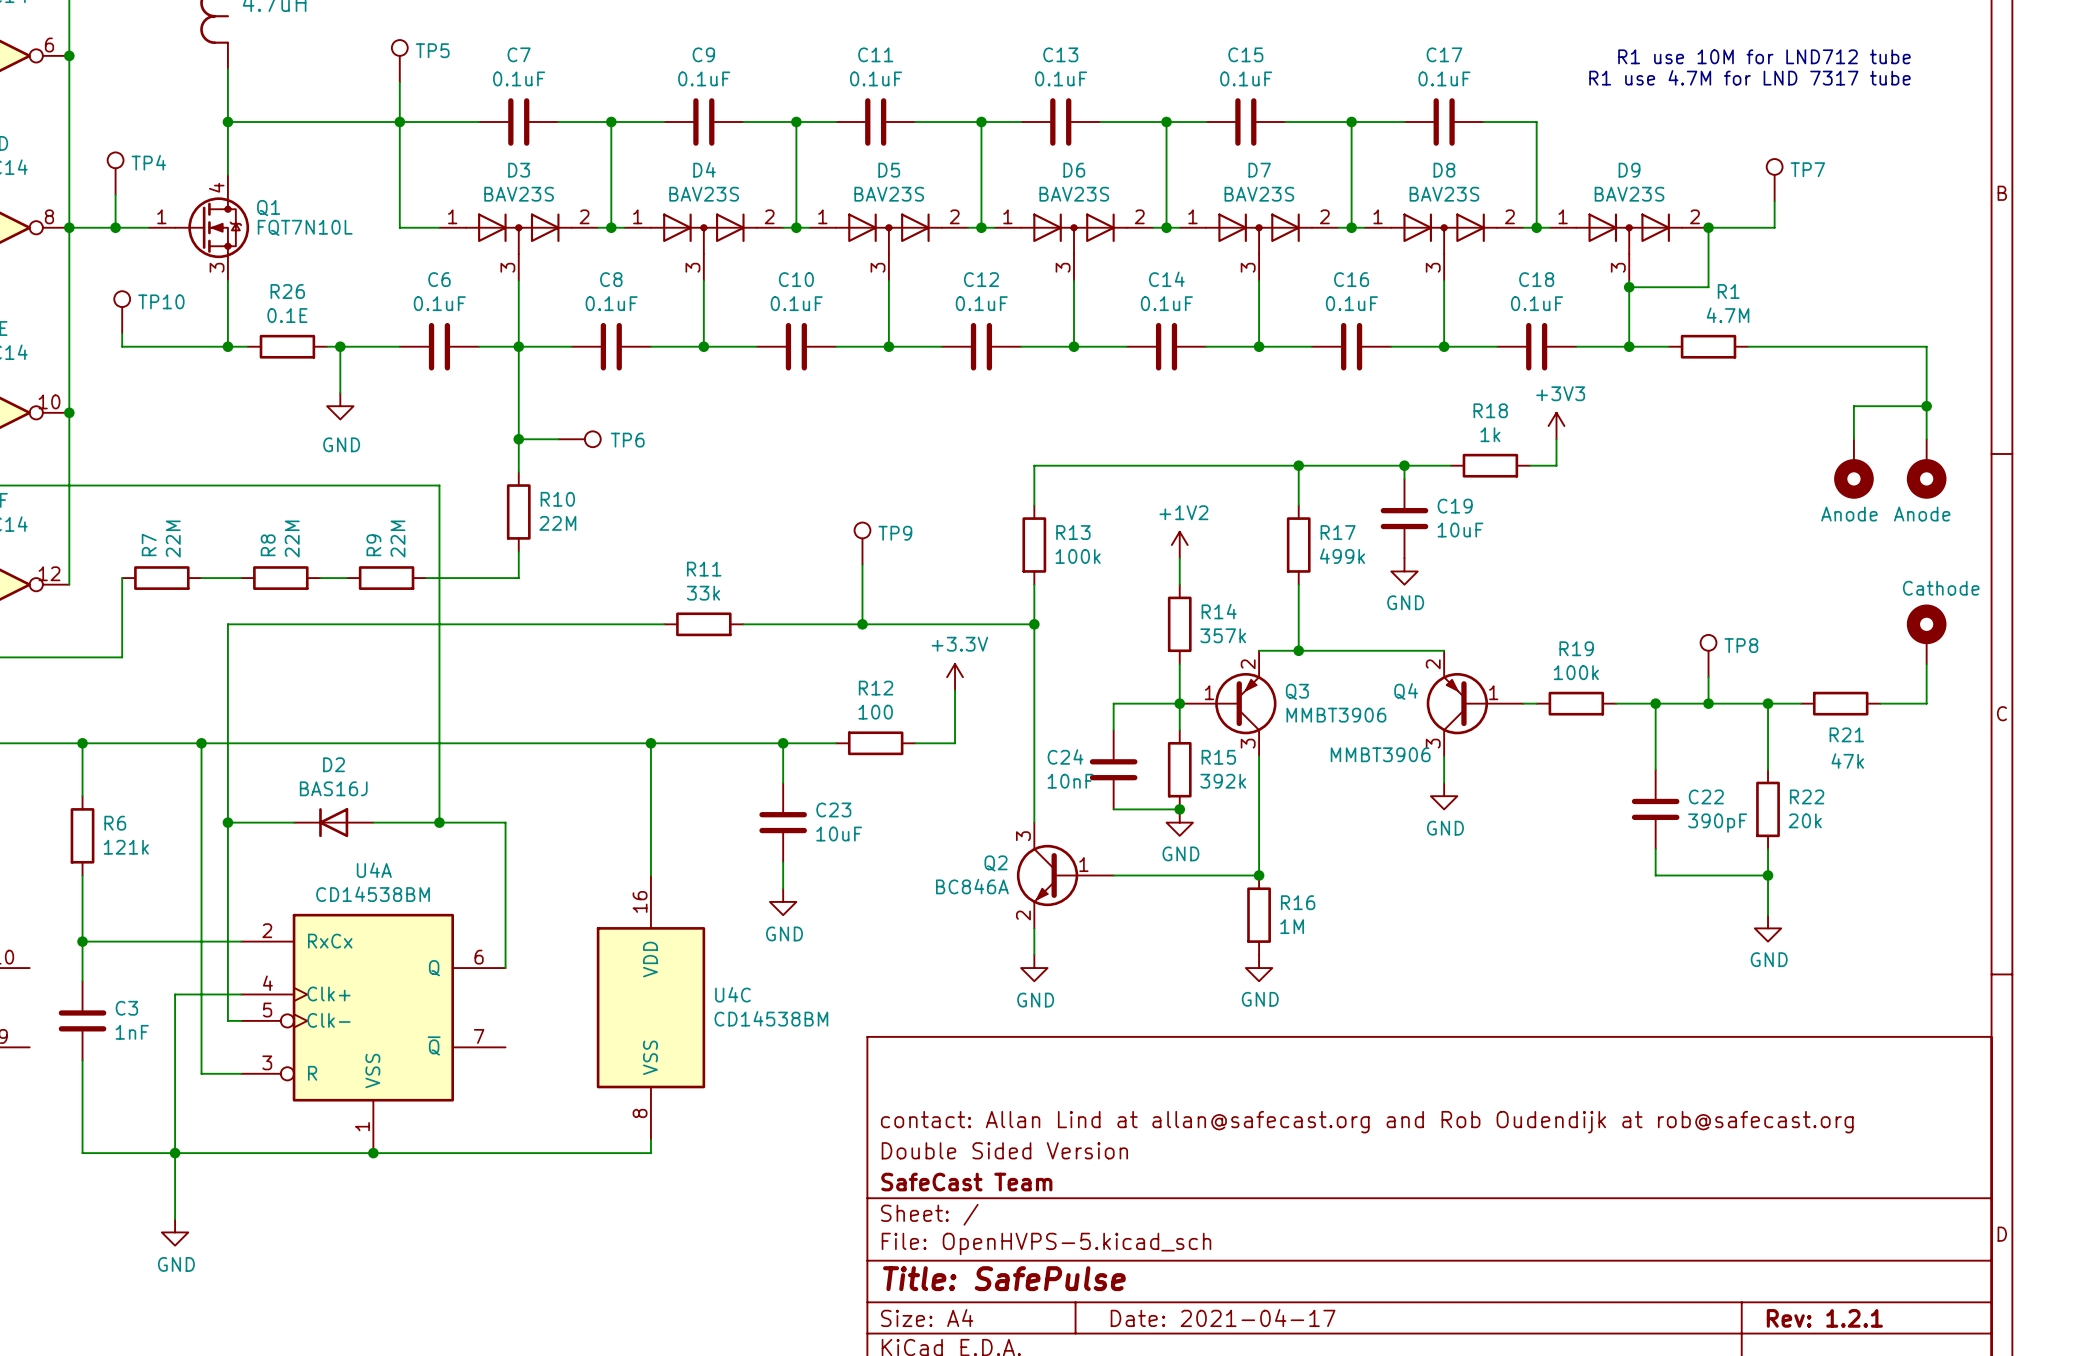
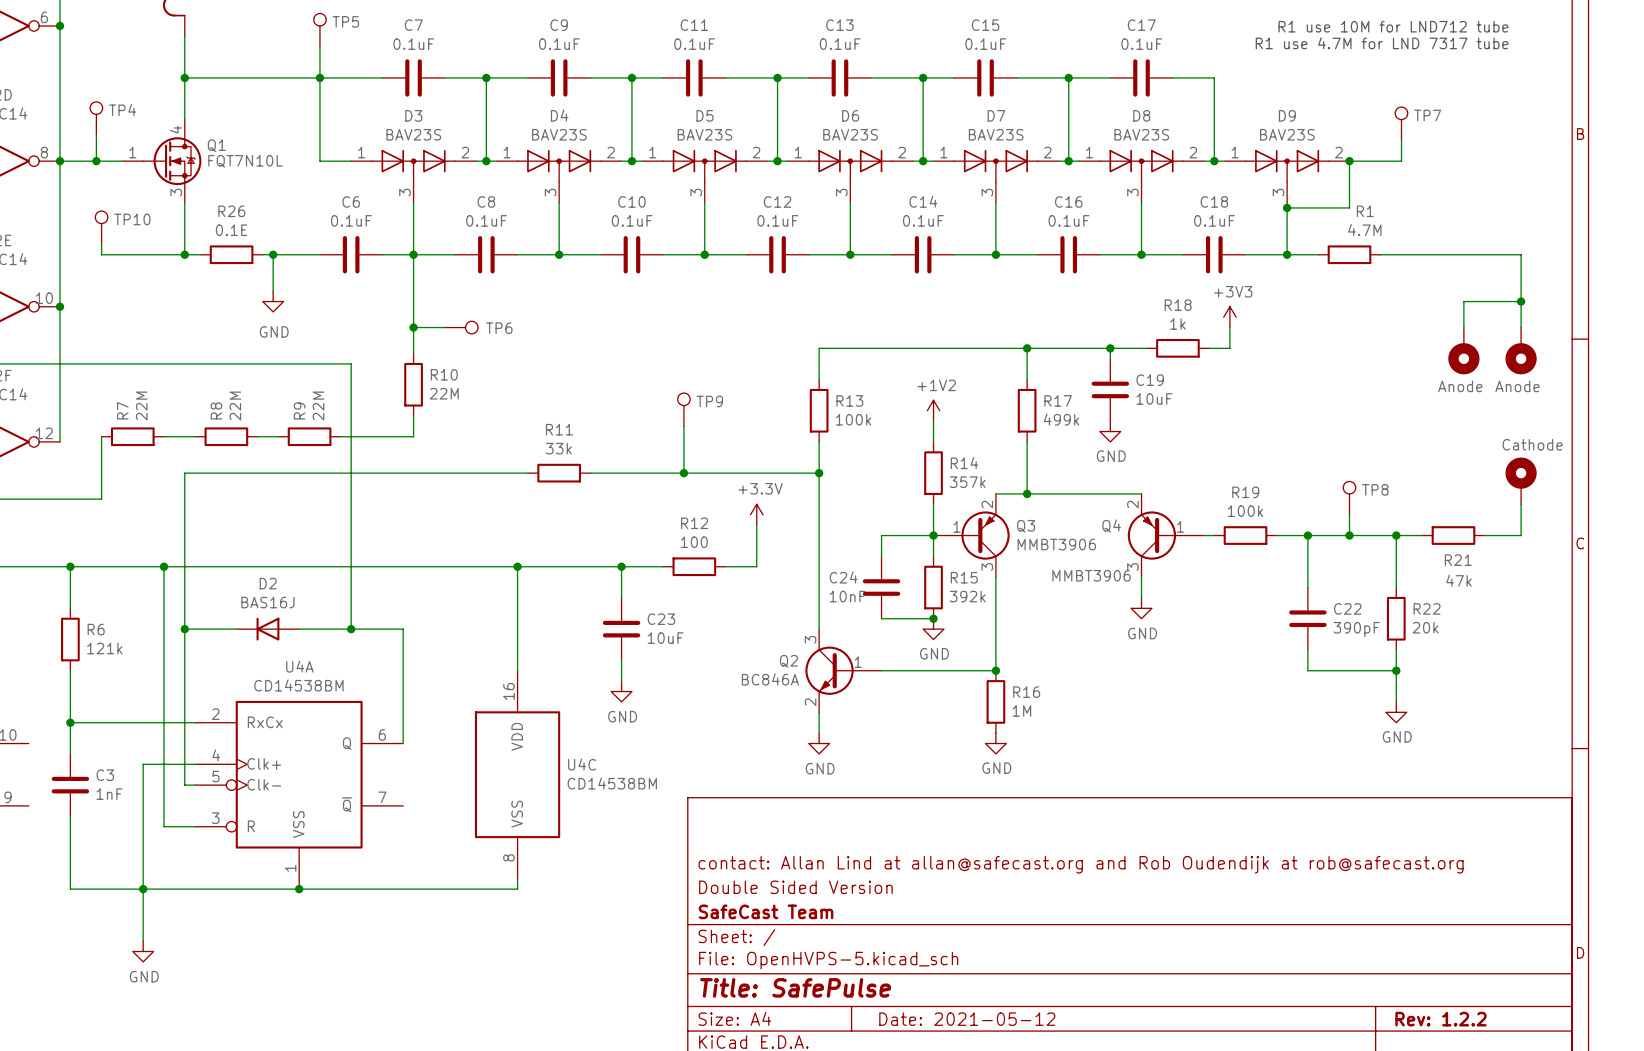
title block: Date: 2021-04-17 (1223, 1318) -> Date: 2021-05-12 (967, 1019)
title block: Rev: 1.2.1 (1824, 1318) -> Rev: 1.2.2 (1440, 1019)

